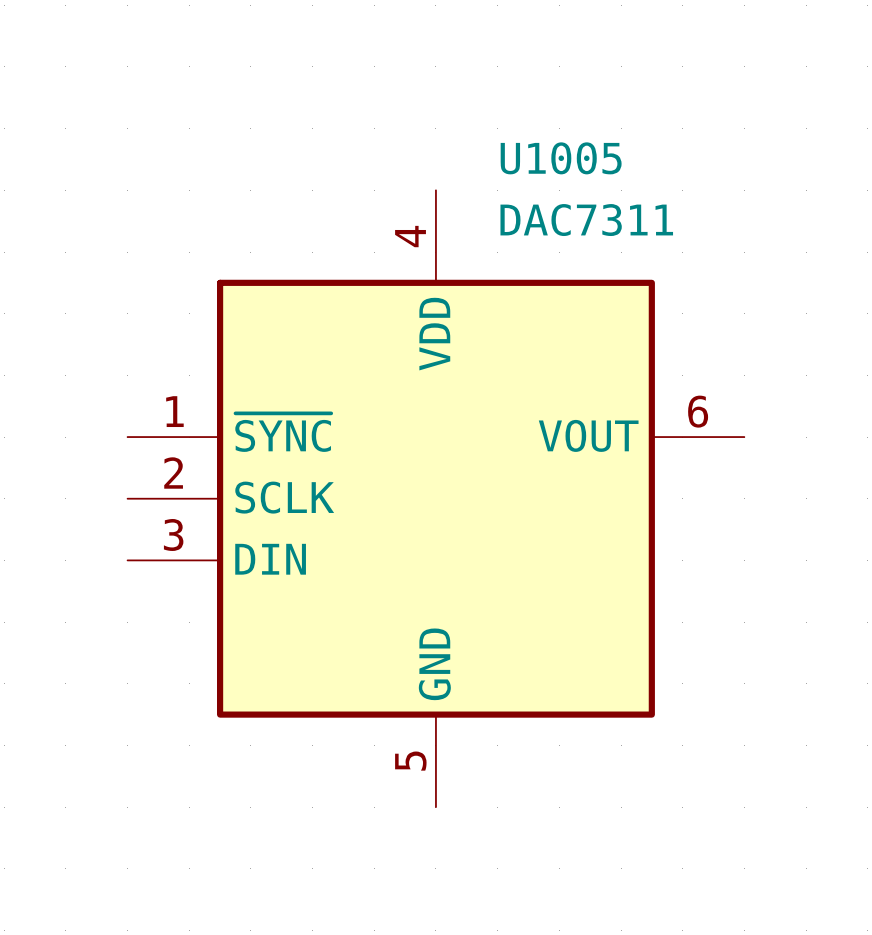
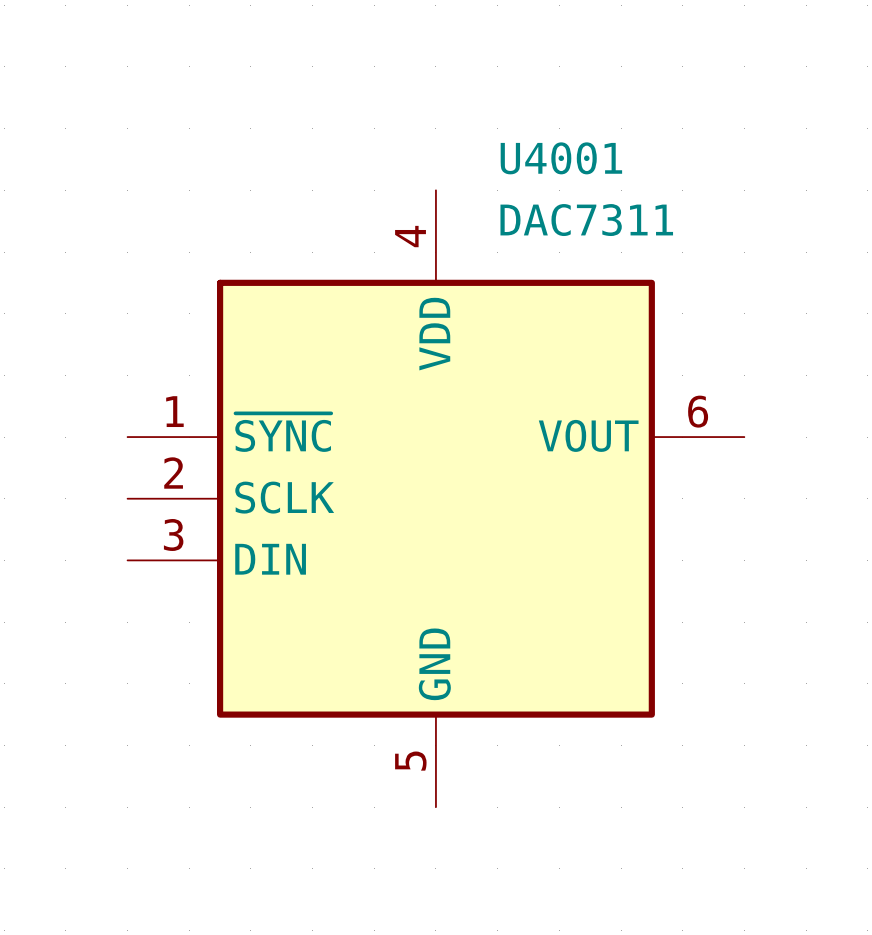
U1005 name: U1005 (561, 158) -> U4001 (561, 158)

